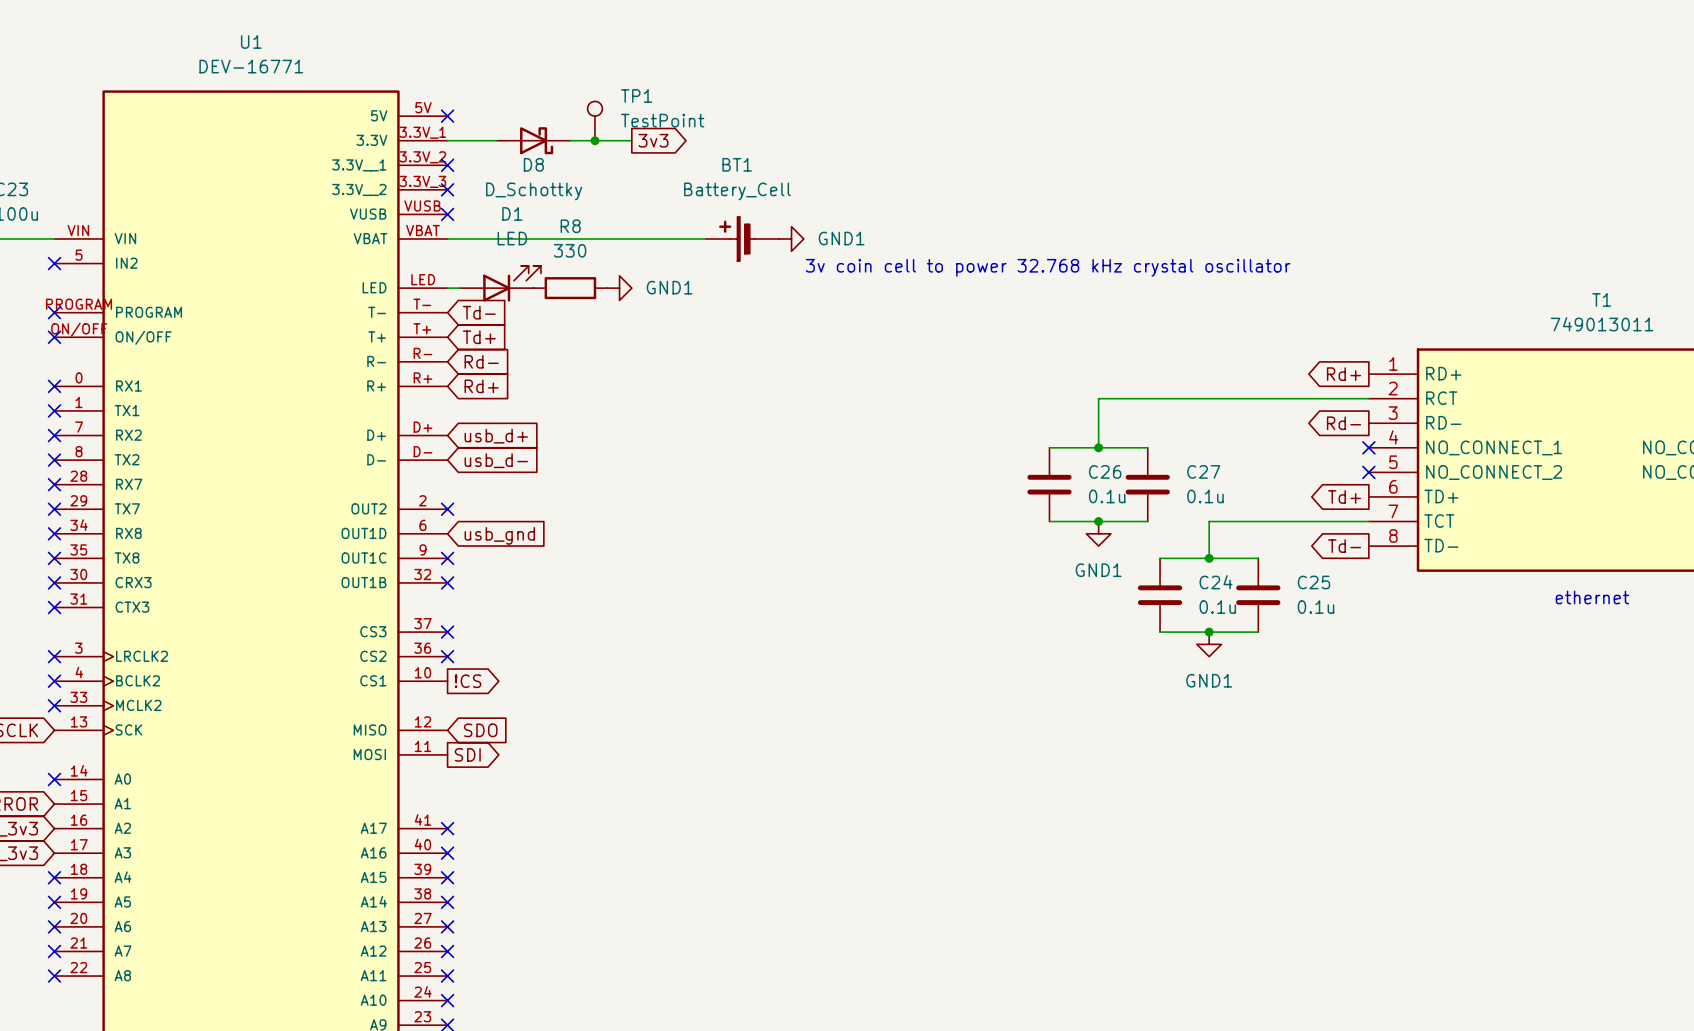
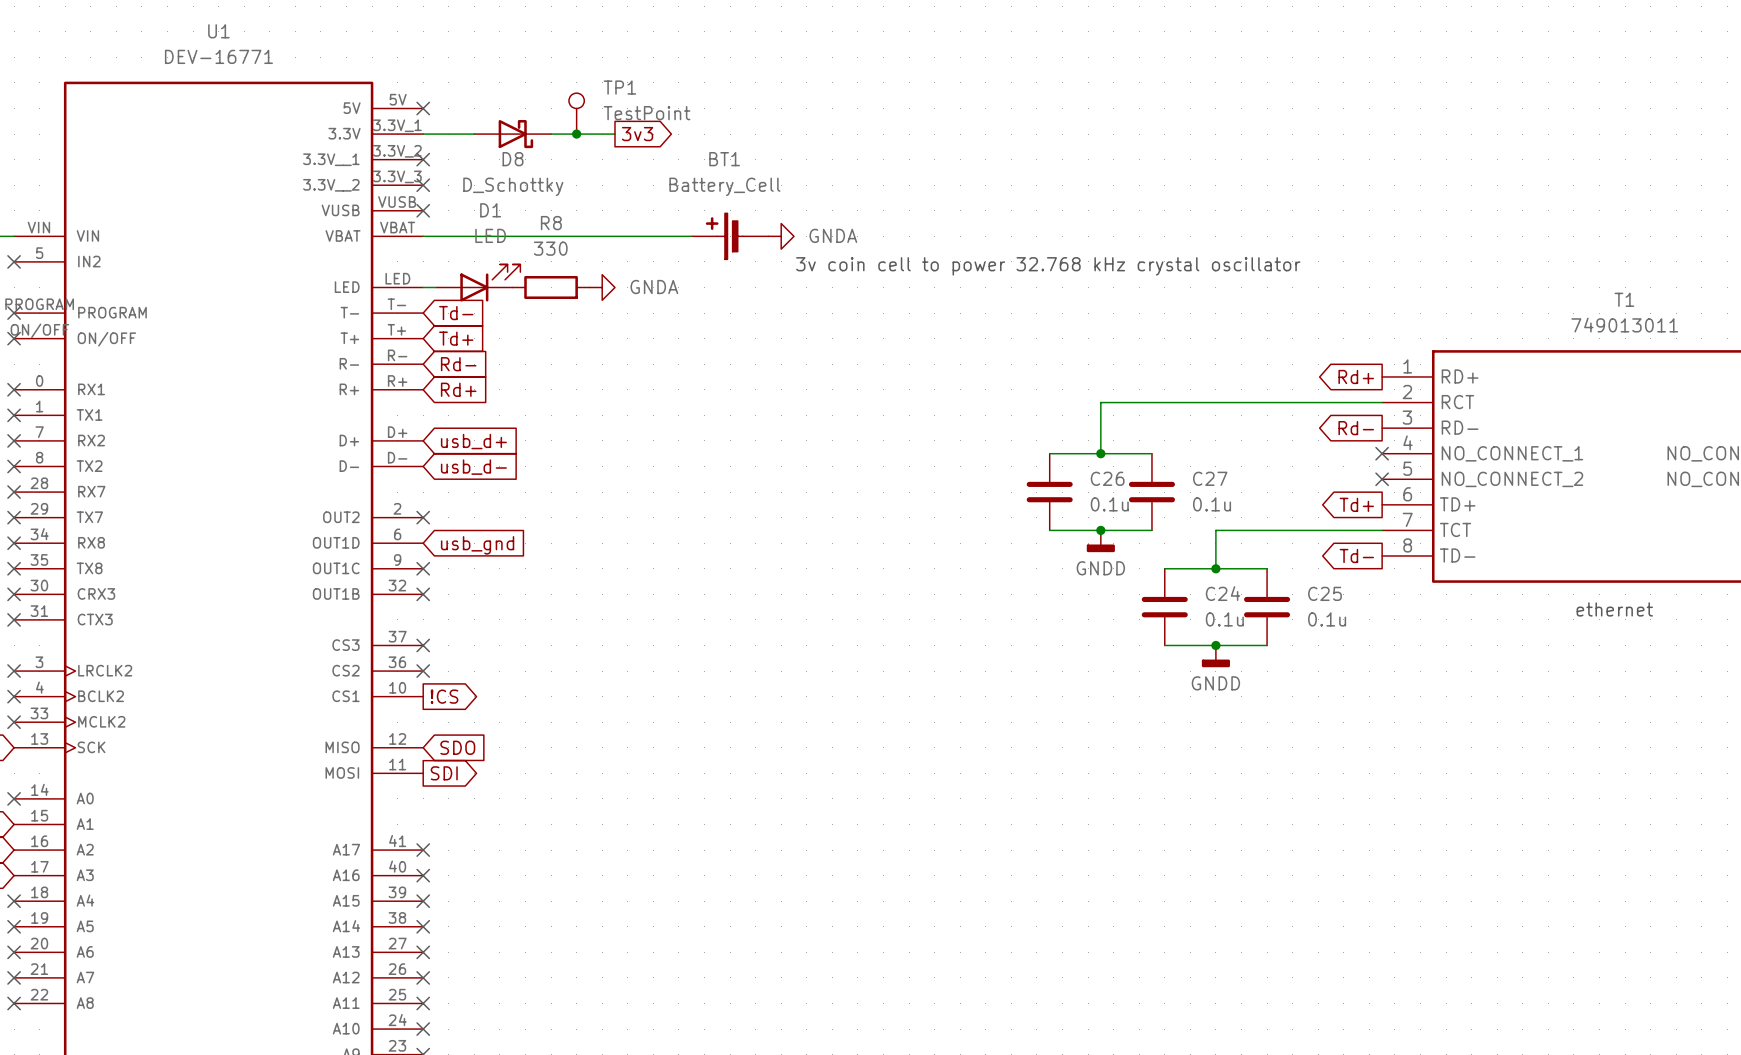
power symbol: GND1 (791, 238) -> GNDA (781, 236)
power symbol: GND1 (619, 288) -> GNDA (602, 287)
power symbol: GND1 (1098, 533) -> GNDD (1100, 541)
power symbol: GND1 (1209, 644) -> GNDD (1215, 656)

